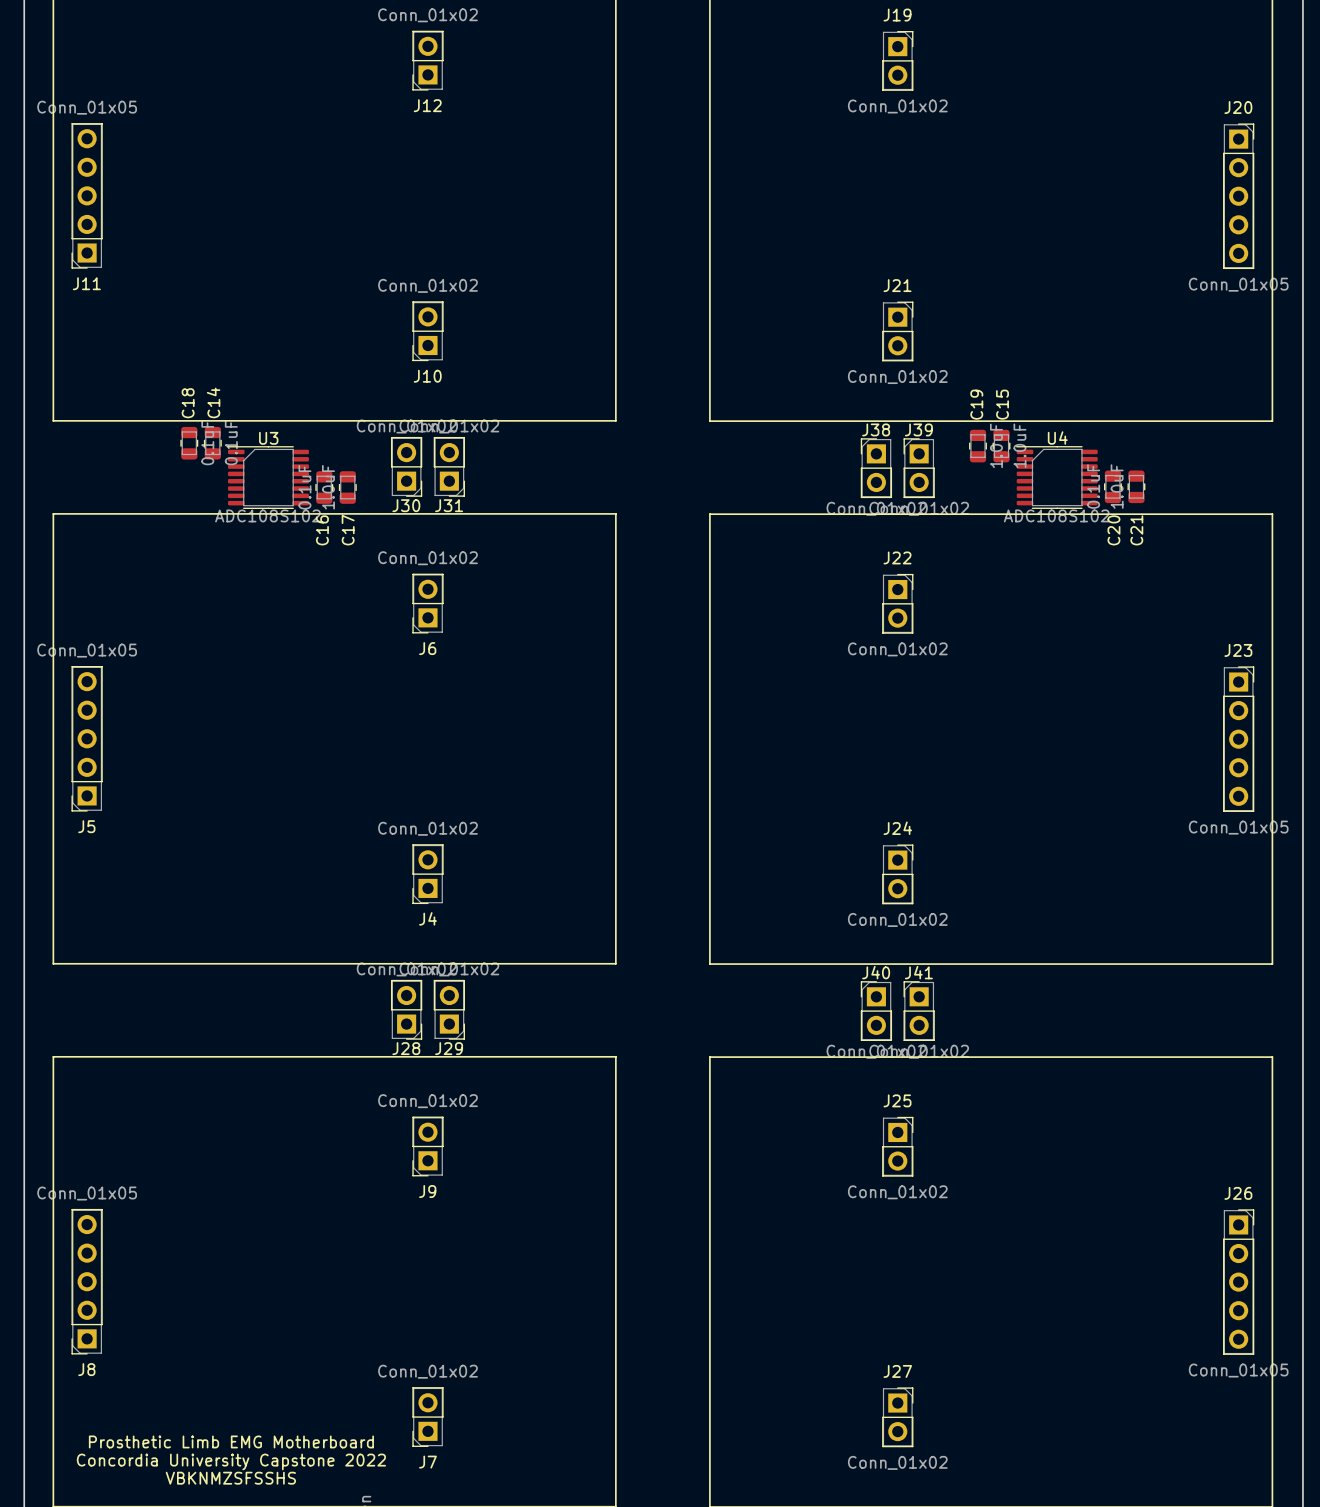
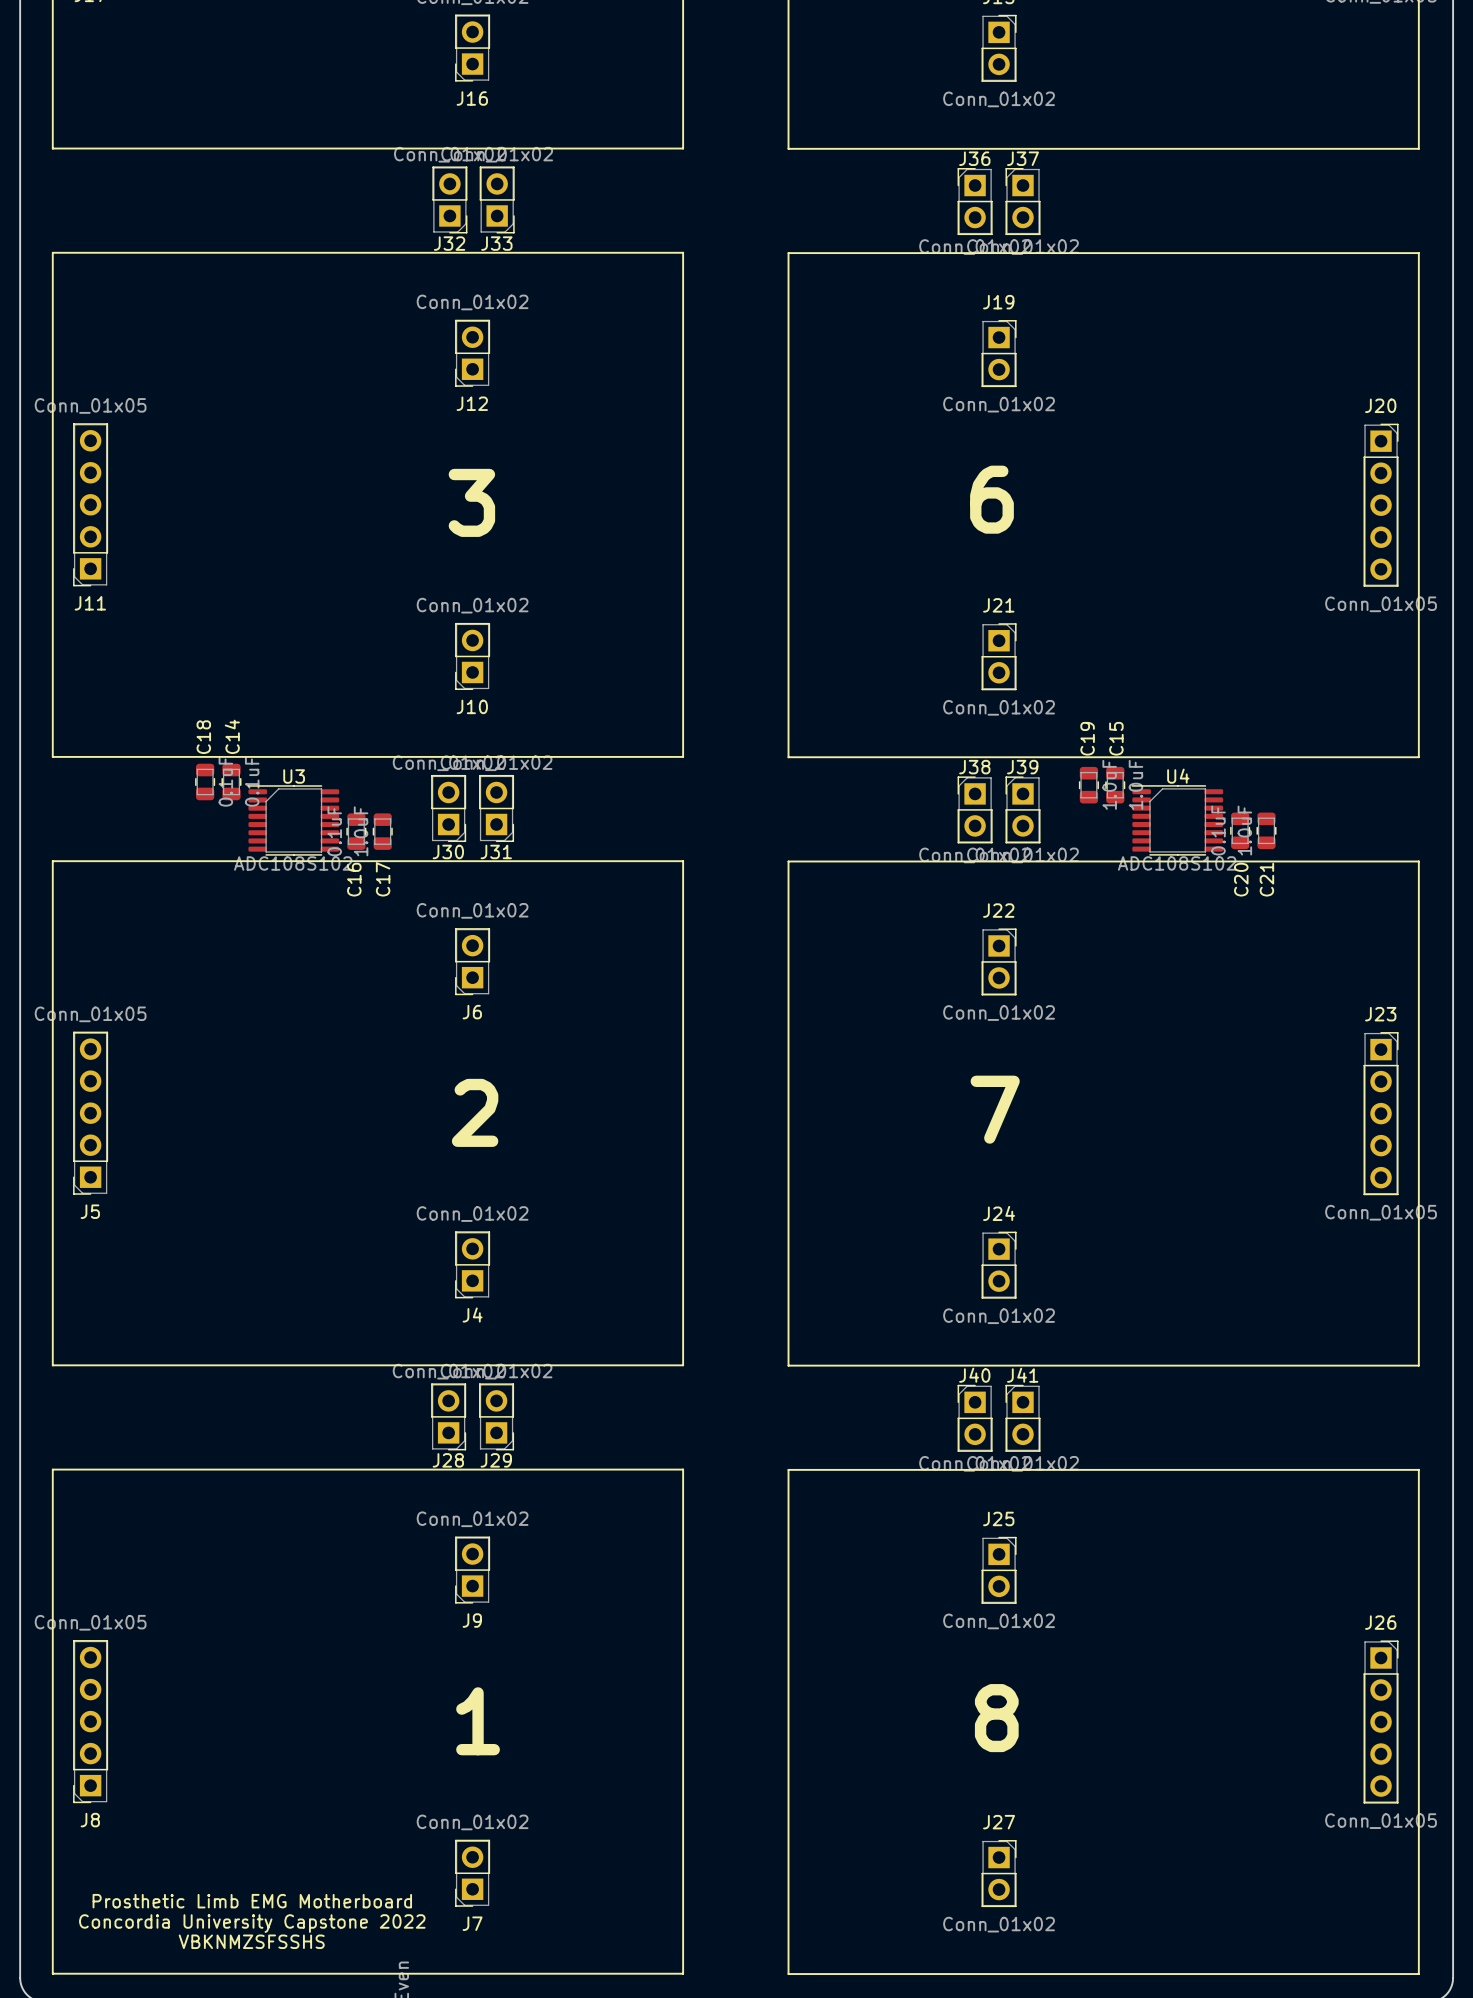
text: none -> 6 (991, 499)
text: none -> 3 (471, 502)
text: none -> 7 (995, 1109)
text: none -> 2 (475, 1112)
text: none -> 8 (996, 1718)
text: none -> 1 (478, 1721)

